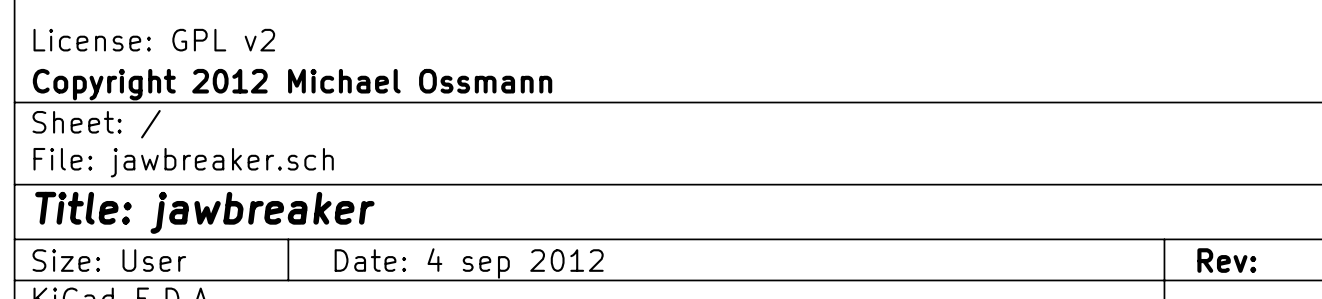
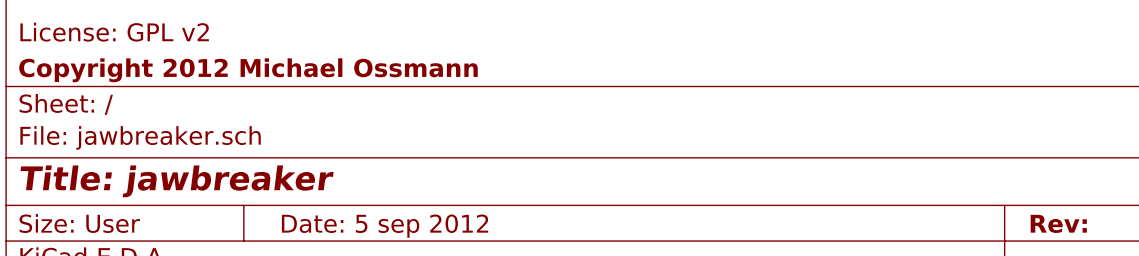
title block: Date: 4 sep 2012 (469, 263) -> Date: 5 sep 2012 (385, 226)

